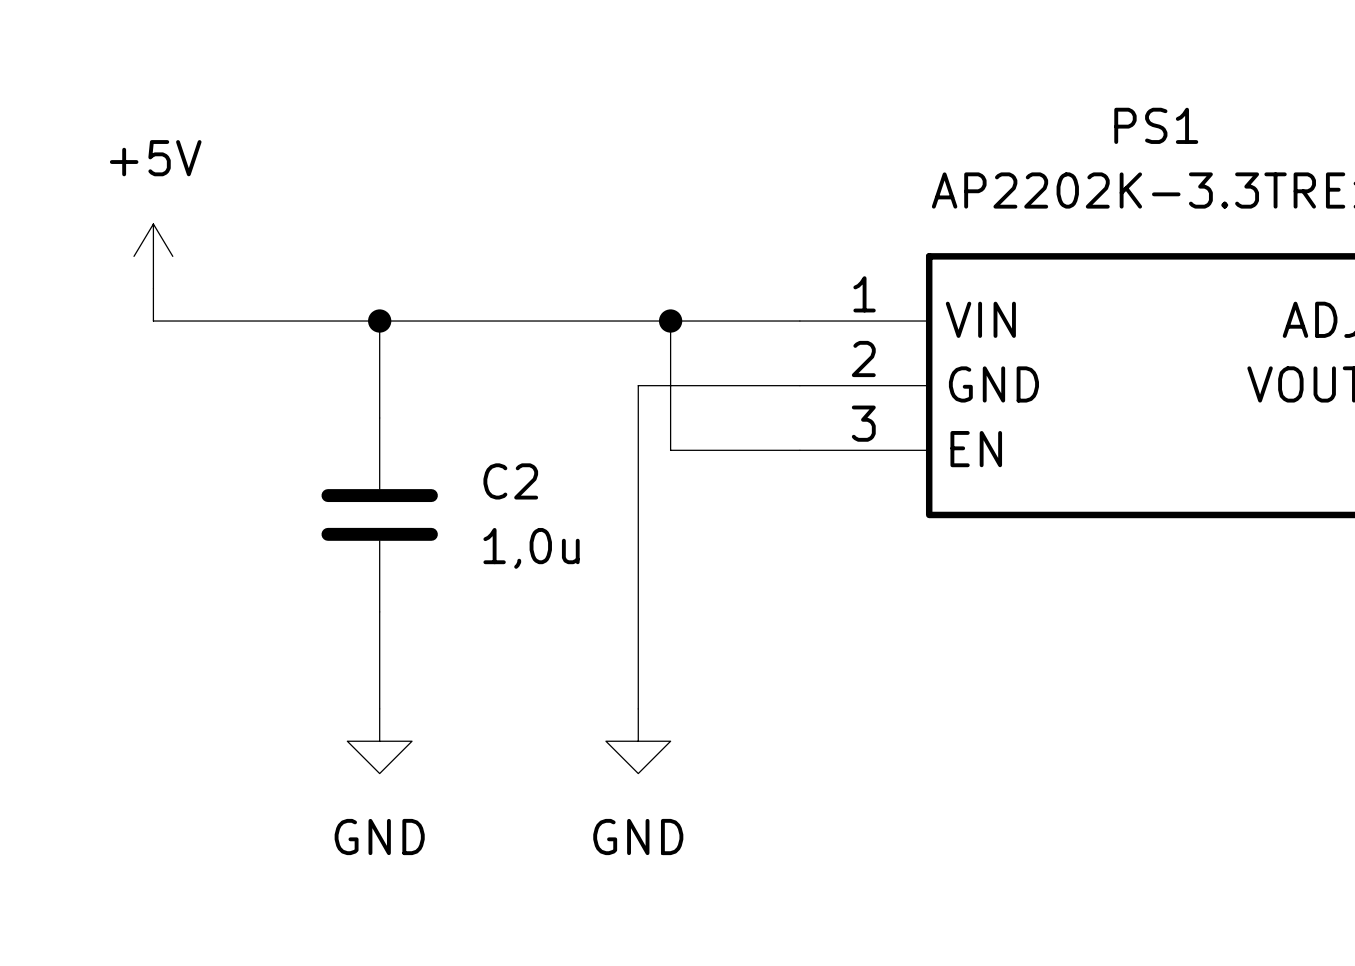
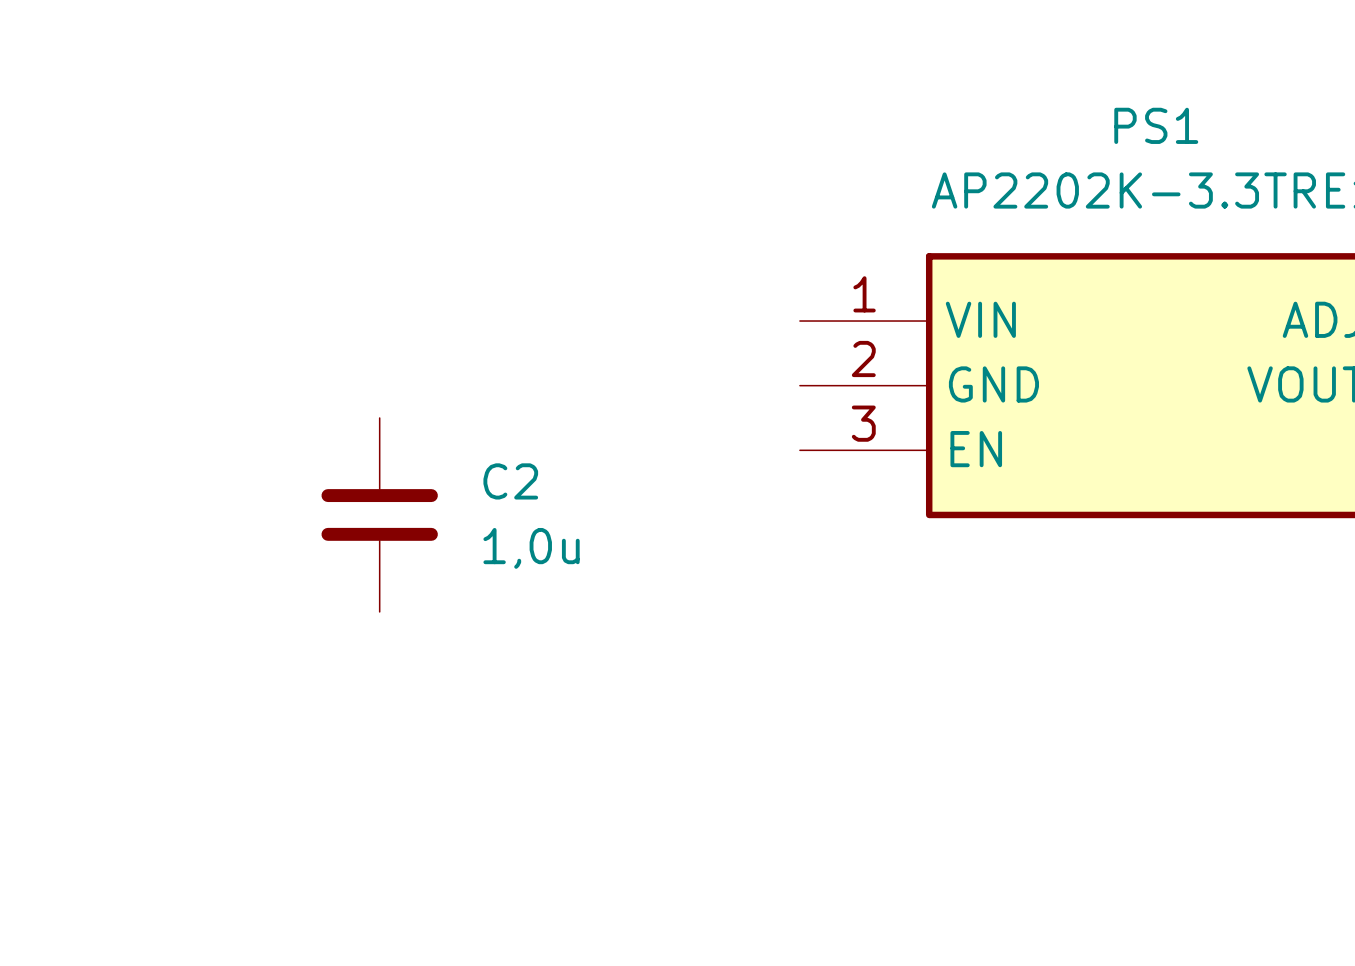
power symbol: +5V (153, 256) -> none
wire: (153, 288) (153, 321) (799, 321) -> none
wire: (379, 321) (379, 417) -> none
junction: (379, 321) -> none
wire: (670, 321) (670, 450) (799, 450) -> none
junction: (670, 321) -> none
wire: (799, 385) (638, 385) (638, 708) -> none
wire: (379, 611) (379, 708) -> none
power symbol: GND (379, 741) -> none
power symbol: GND (638, 741) -> none

